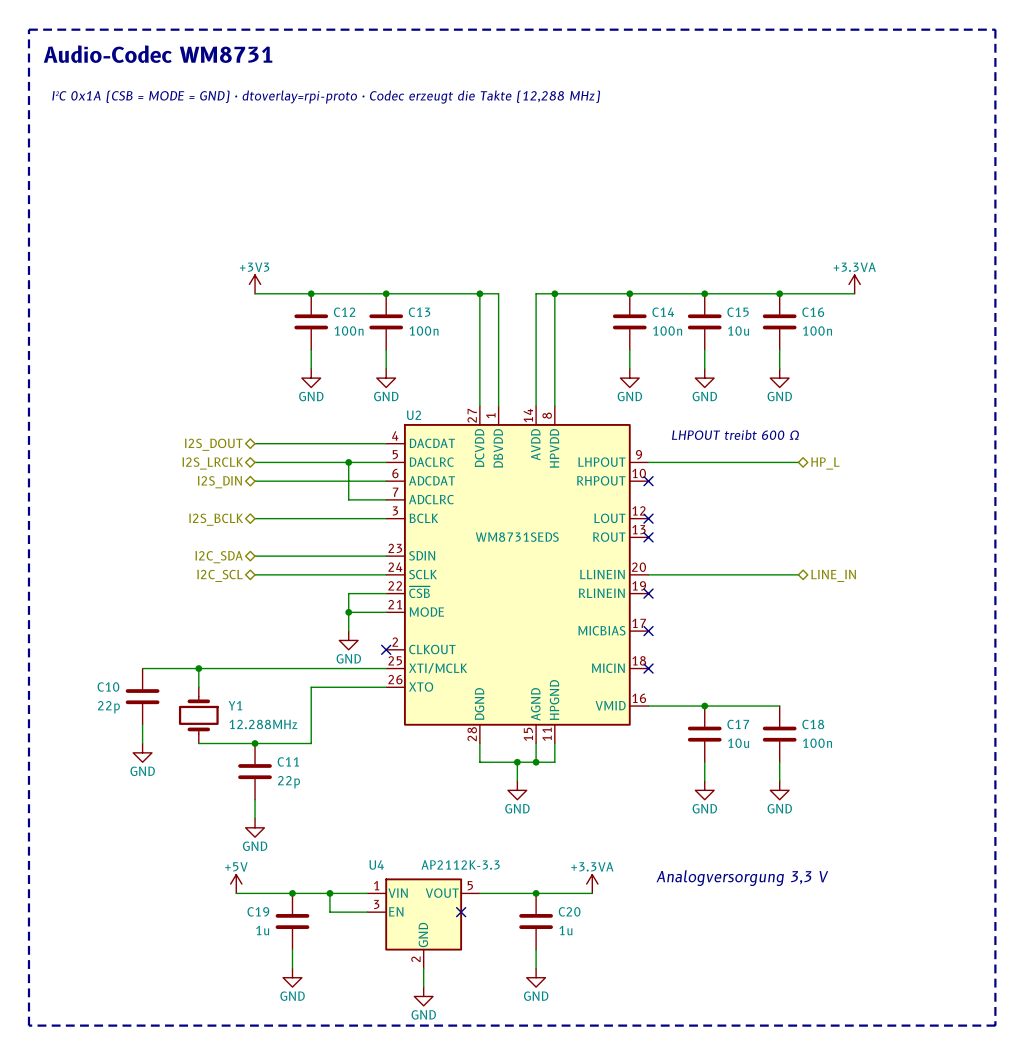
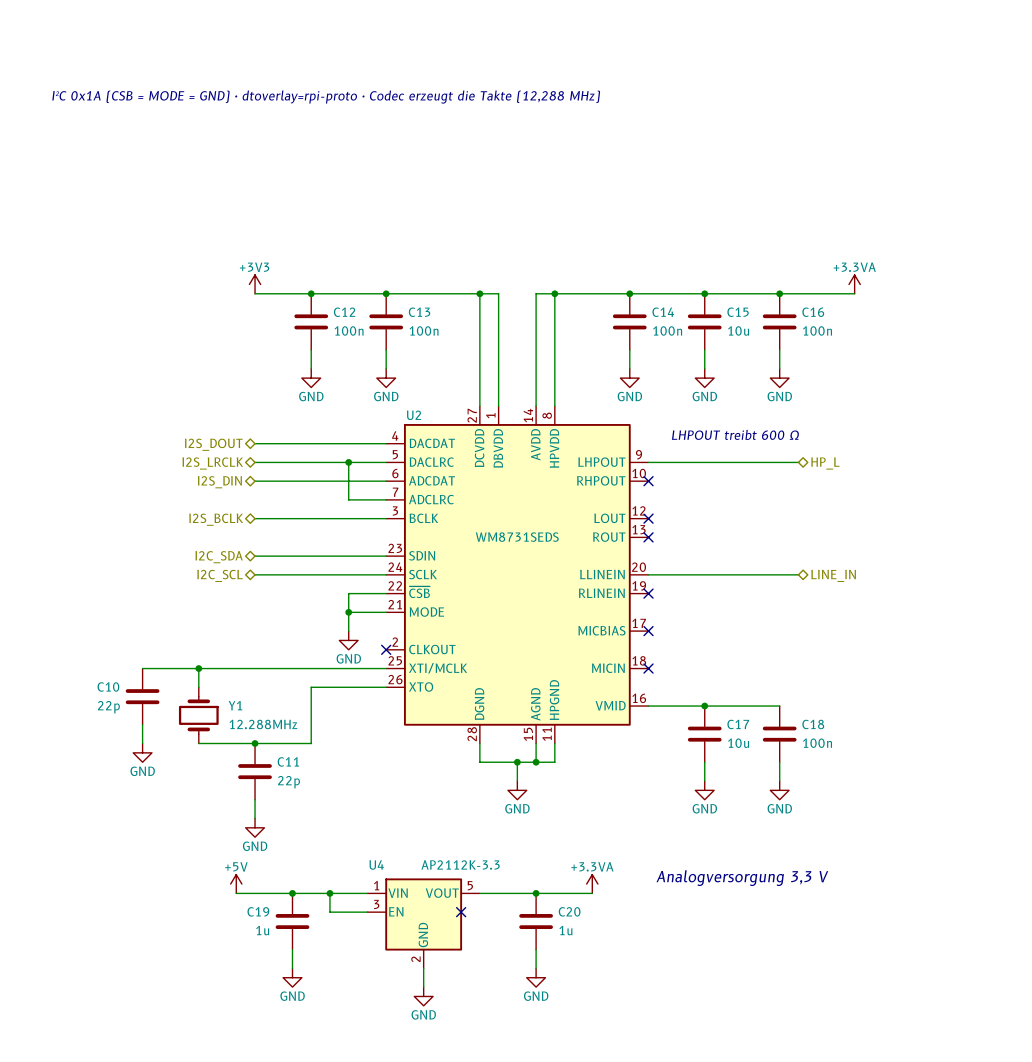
line: (28, 29) (995, 29) (995, 1025) (28, 1025) (28, 29) -> none
text: Audio-Codec WM8731 (158, 54) -> none

